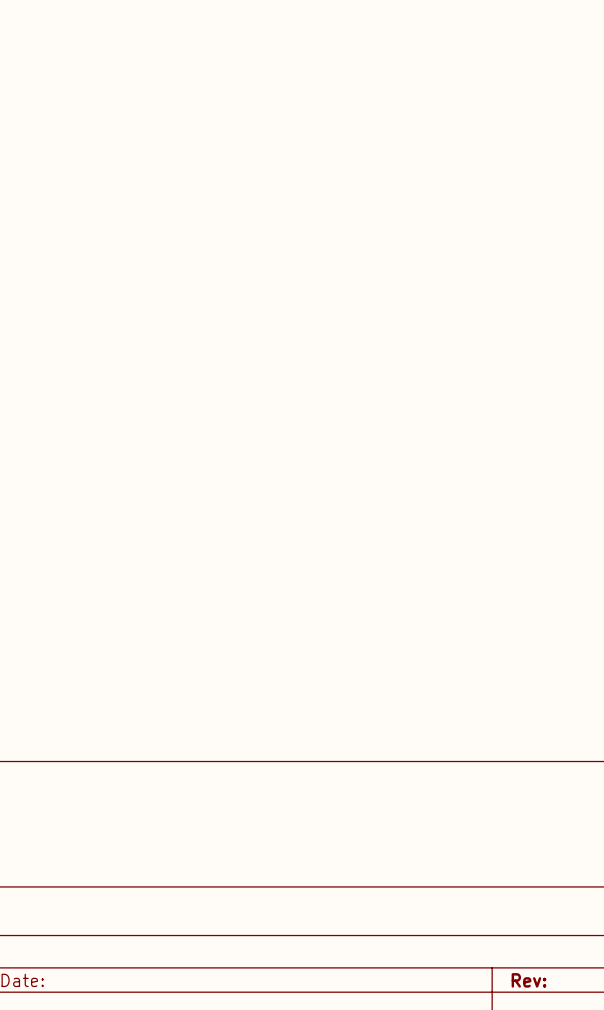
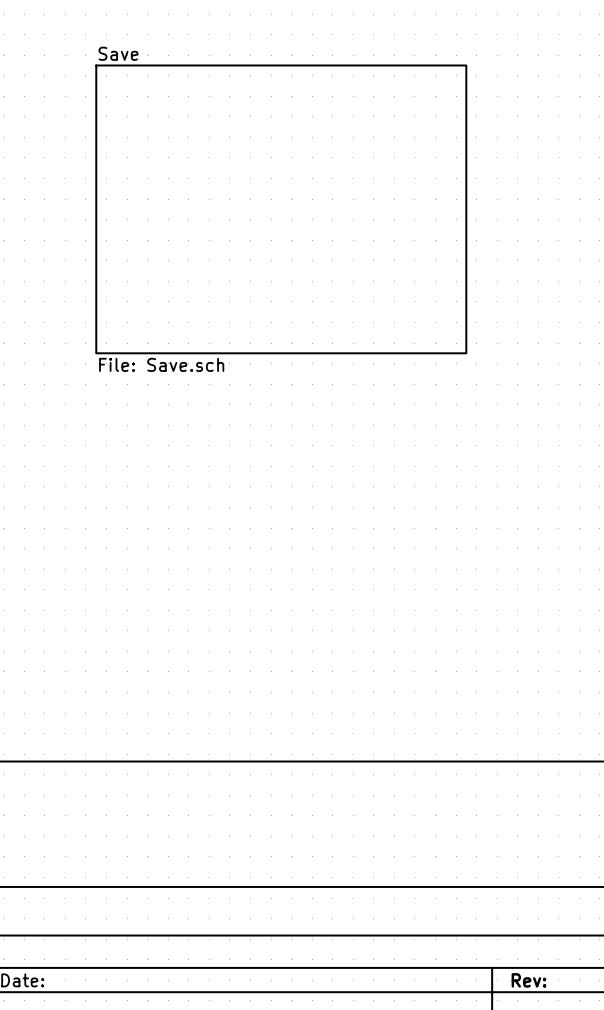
sheet Save: none -> File: Save.sch (281, 209)

